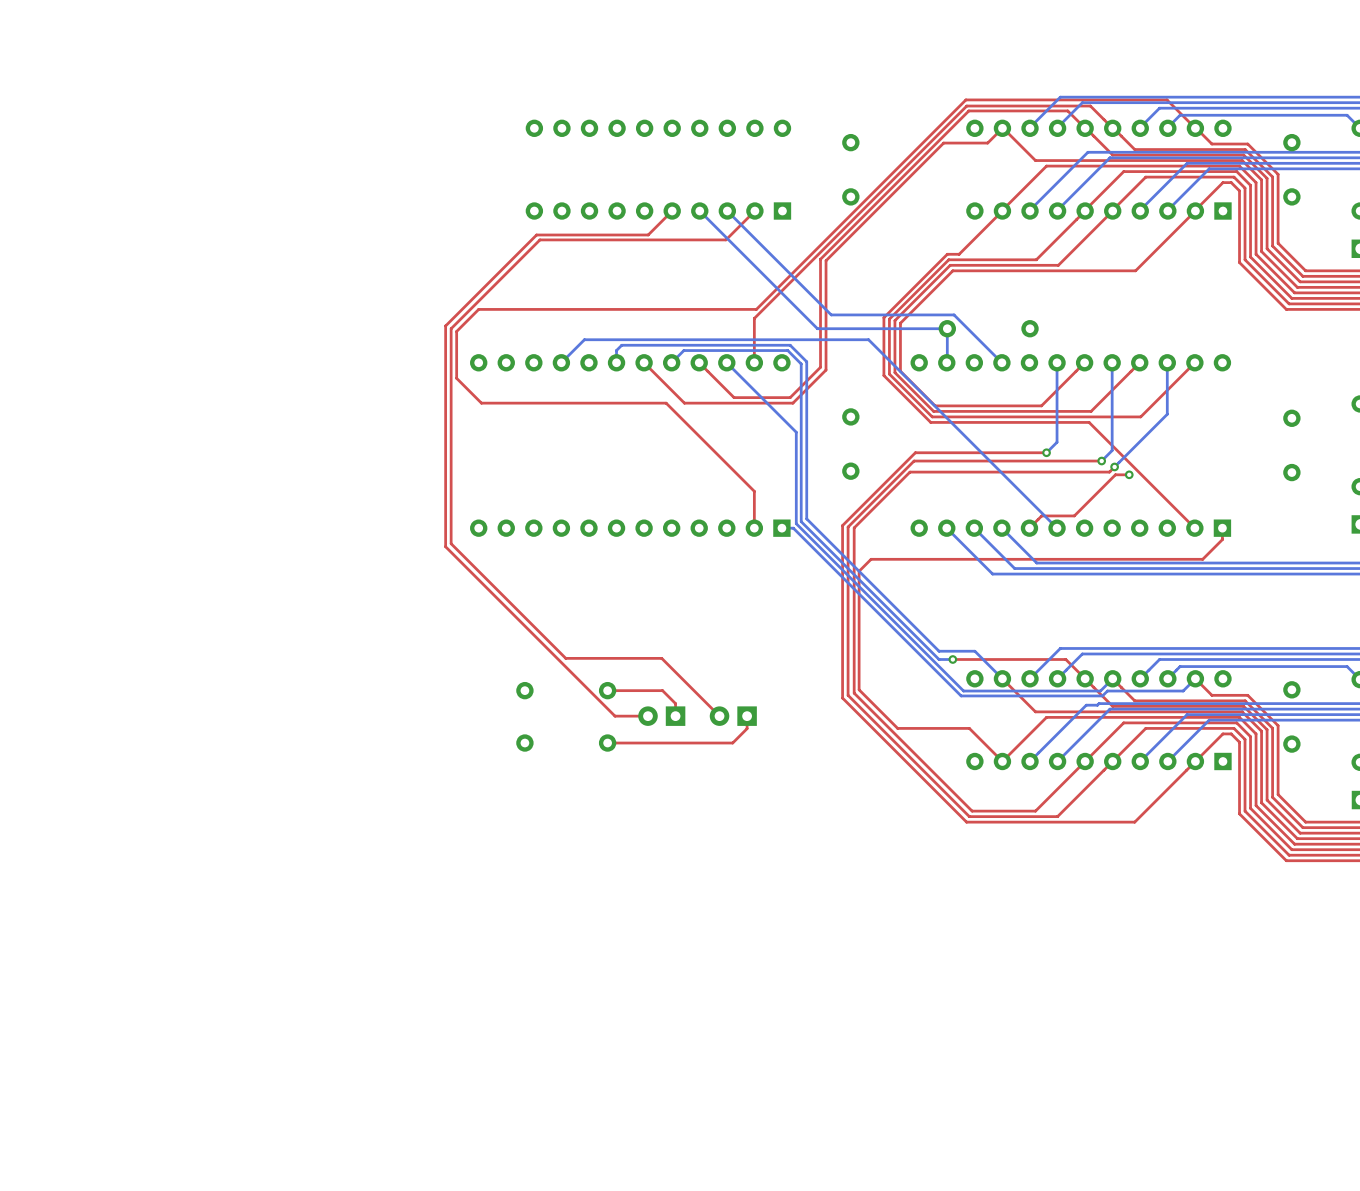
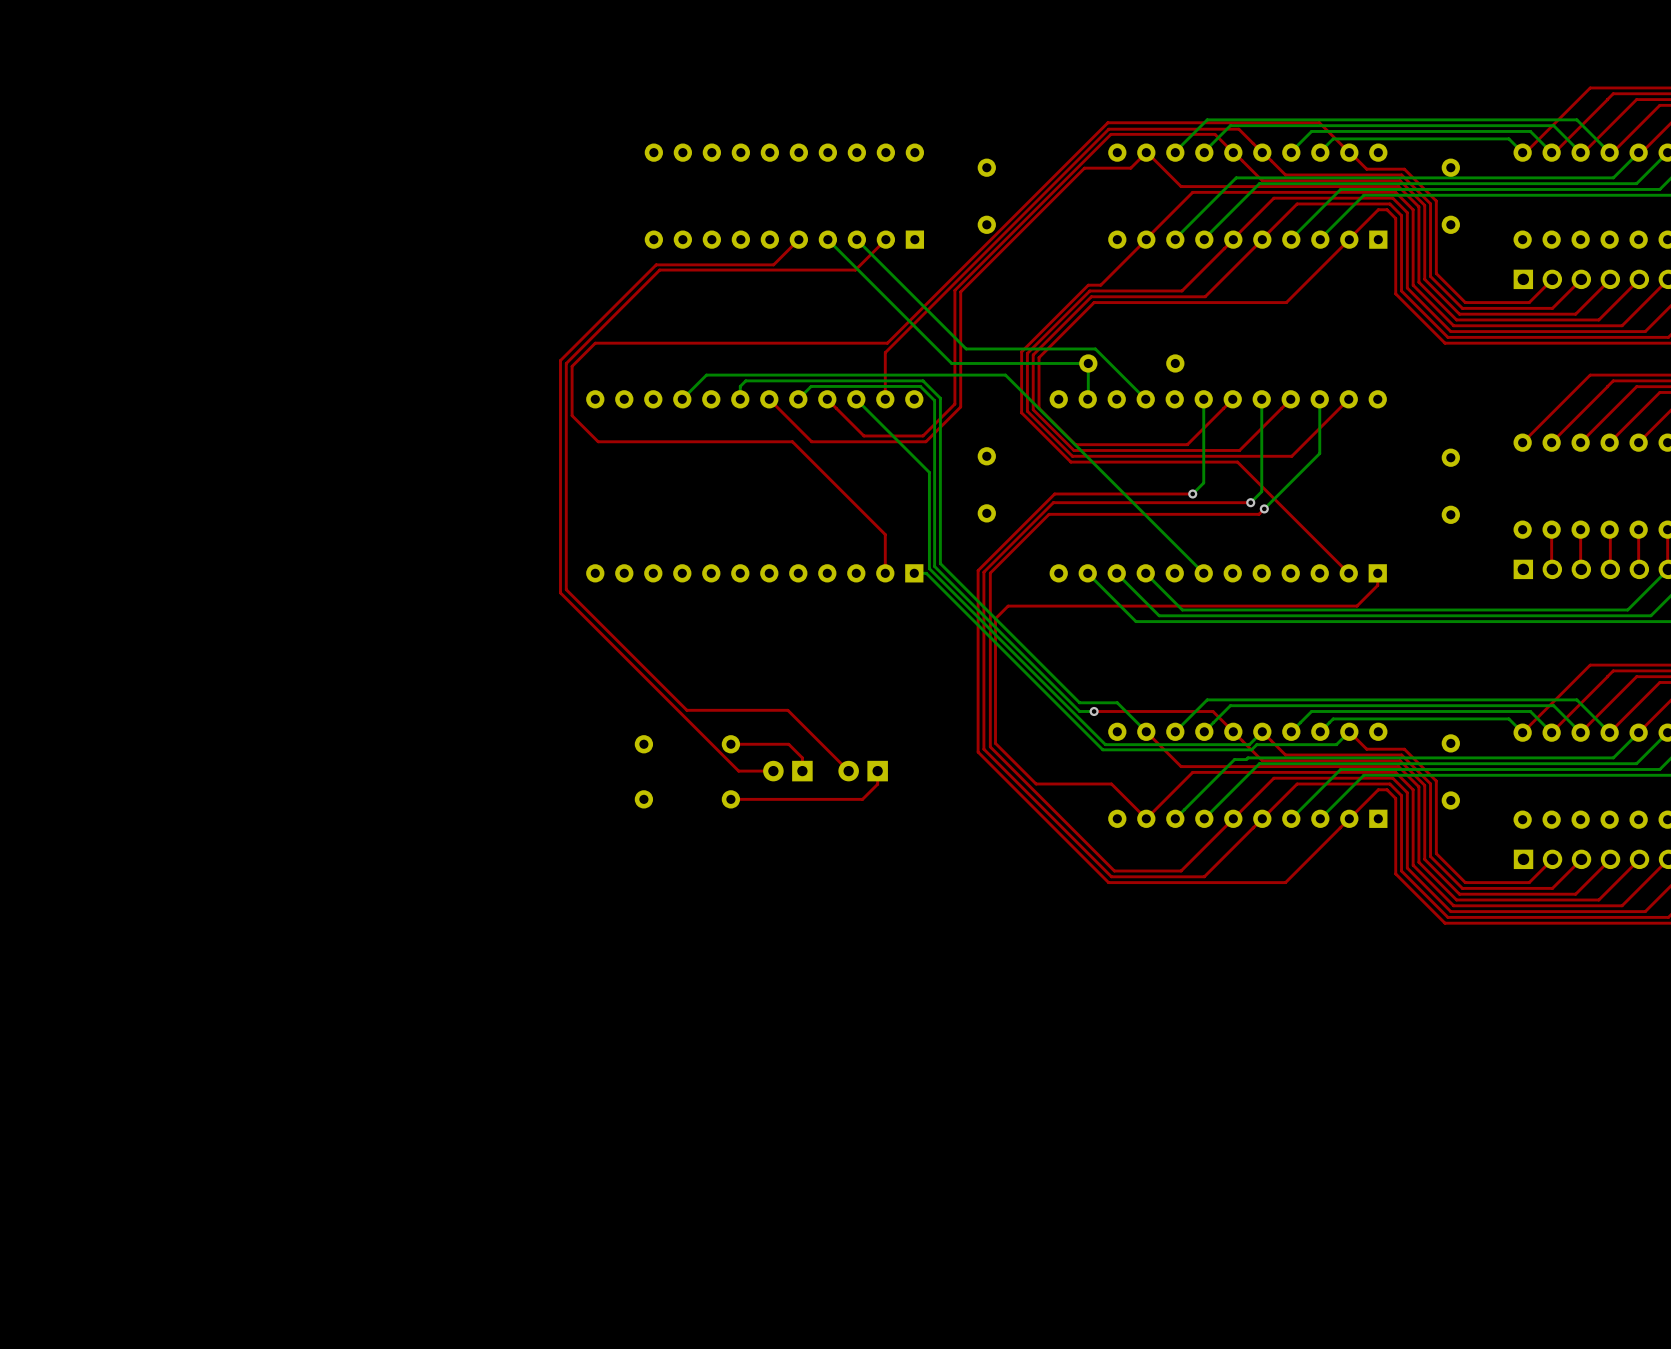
top track: (1129, 474) (1115, 474) (1074, 515) (1041, 515) (1029, 528) -> none
via: (1129, 474) -> none

